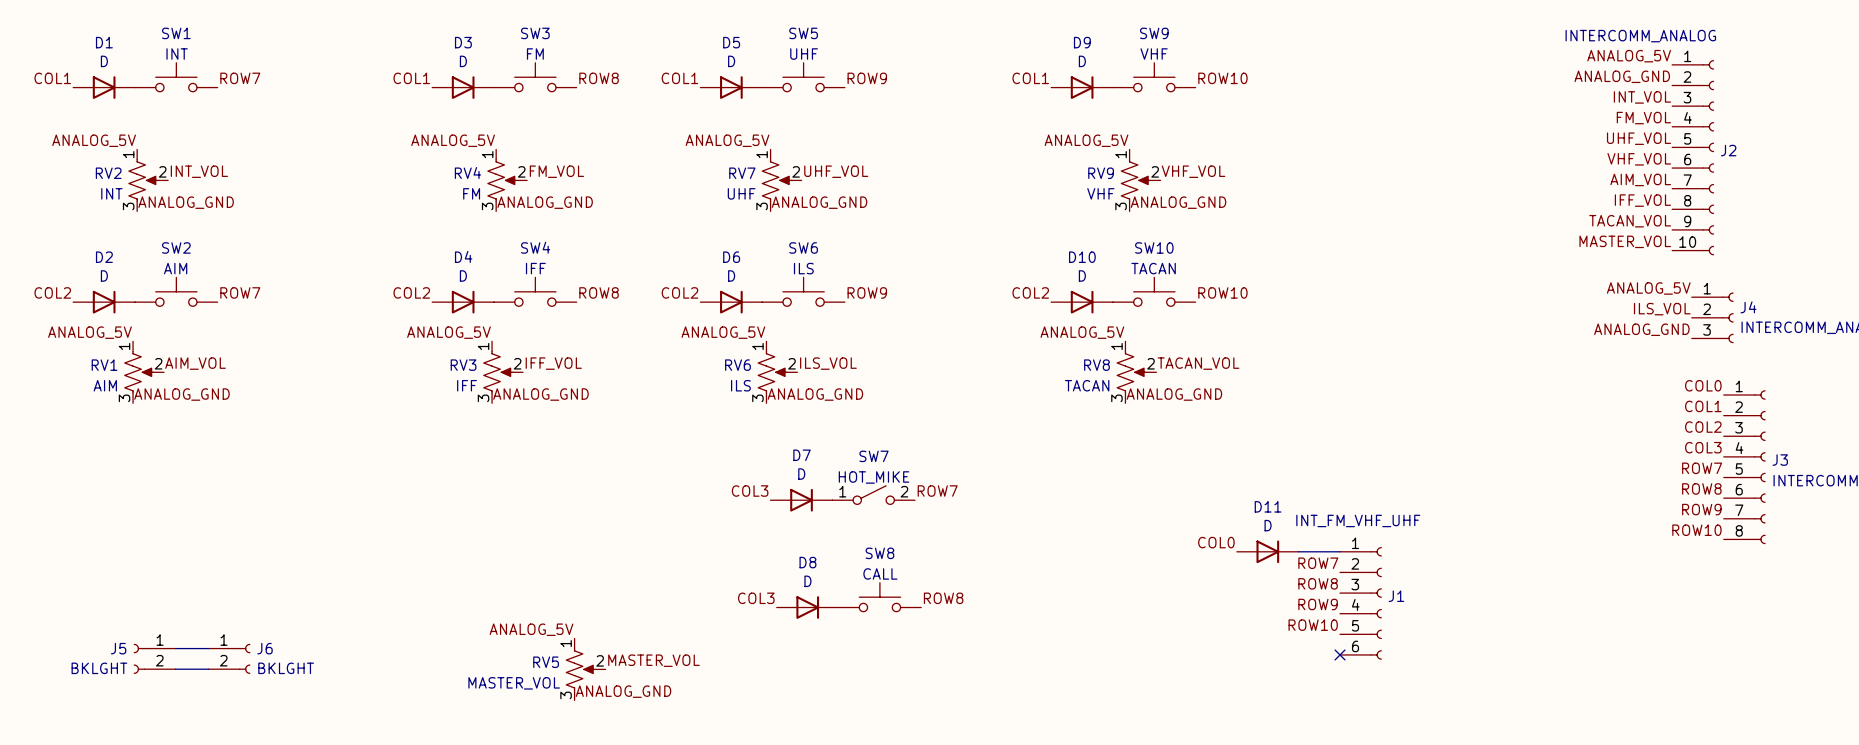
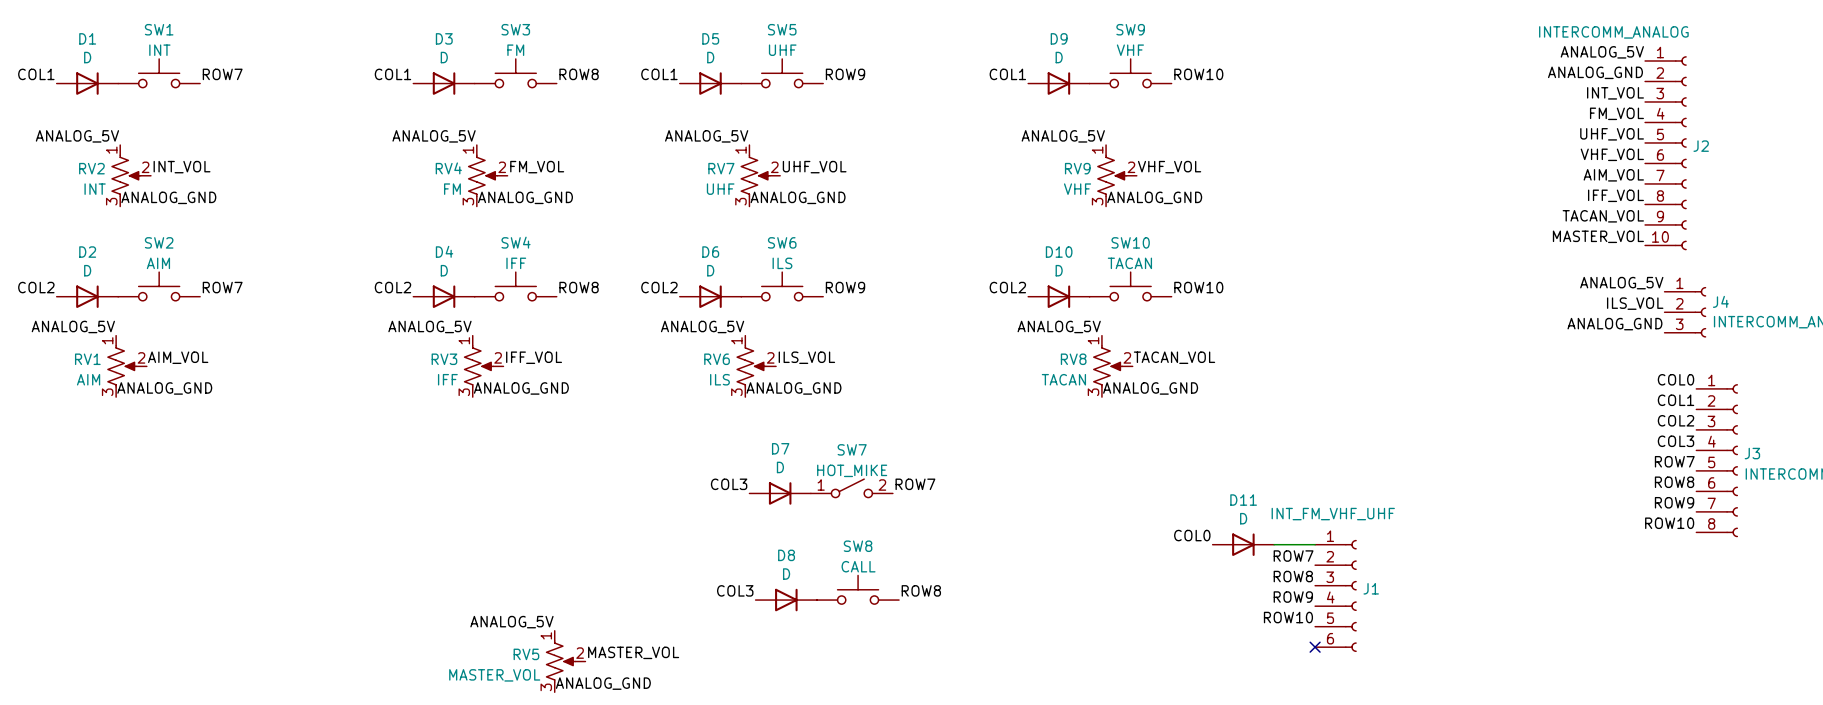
wire: (175, 648) (208, 648) -> none
J5: BKLGHT (154, 658) -> none
J6: BKLGHT (229, 658) -> none
wire: (175, 669) (208, 669) -> none

